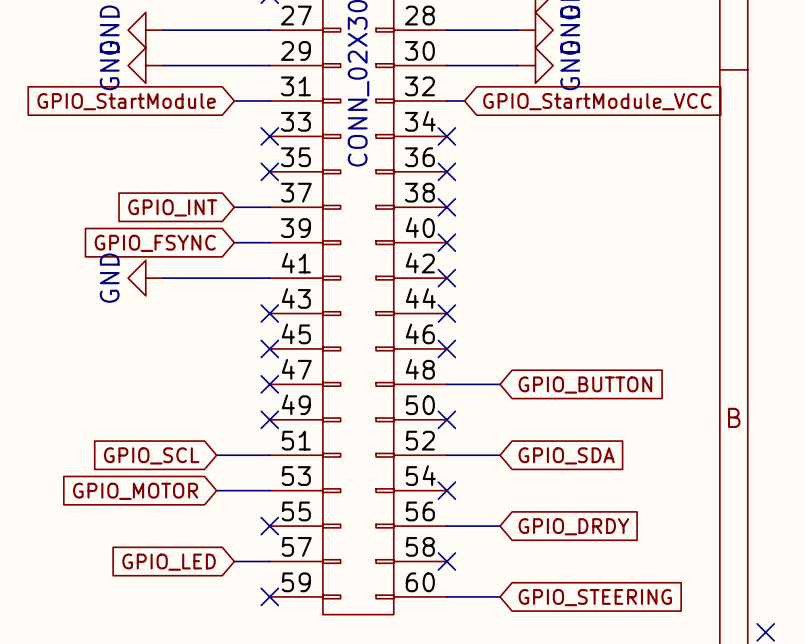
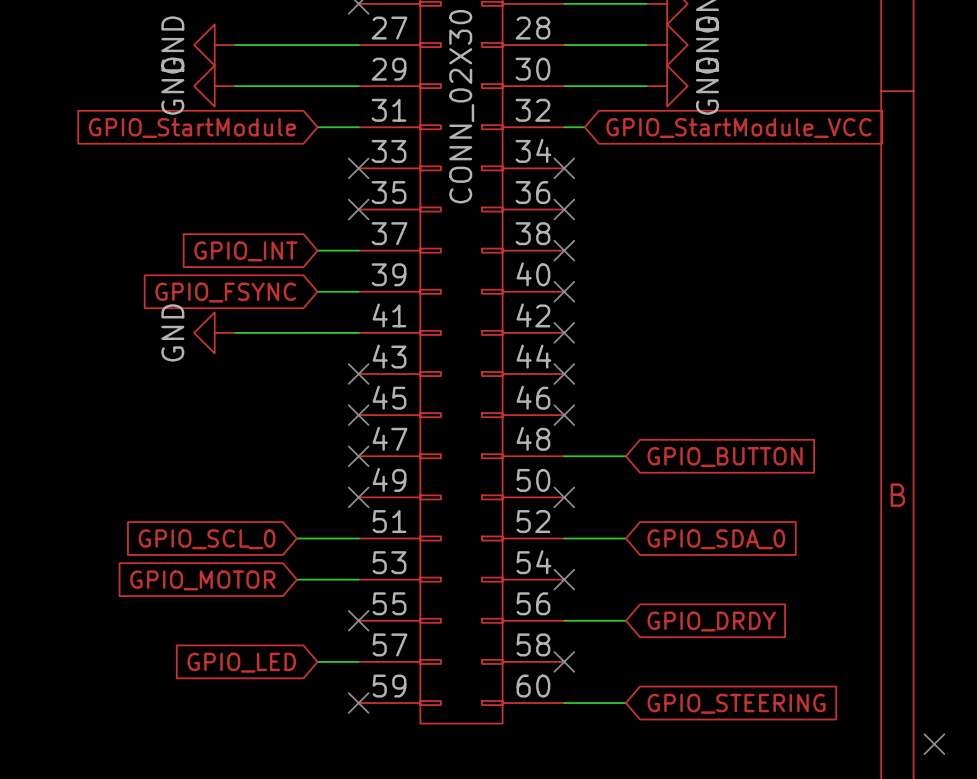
global label: GPIO_SCL (151, 455) -> GPIO_SCL_0 (207, 539)
global label: GPIO_SDA (566, 455) -> GPIO_SDA_0 (716, 539)

